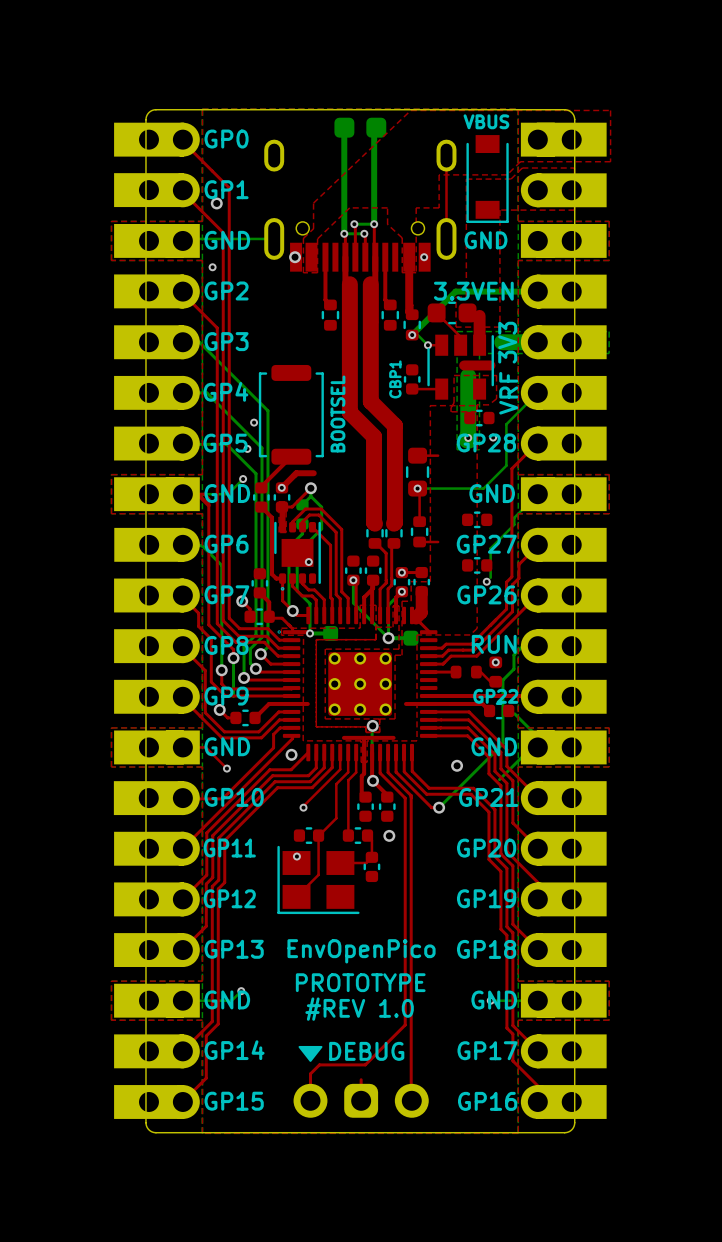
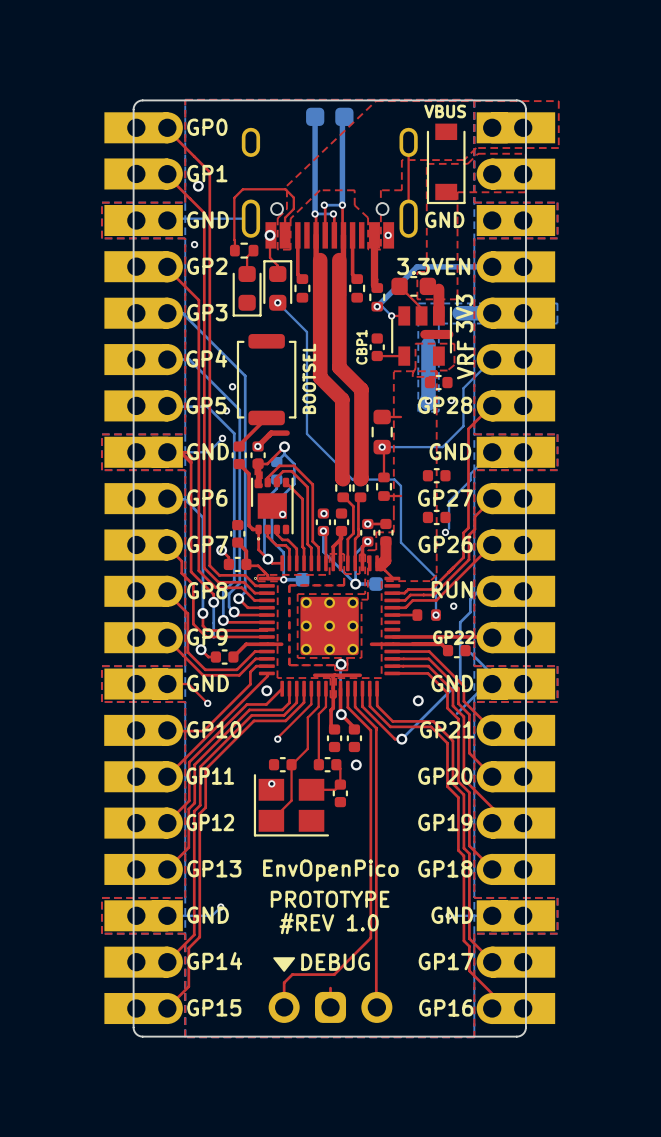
top track: none -> (270, 235) (270, 257) (277, 265) (277, 274)
top track: none -> (285, 235) (285, 217) (293, 209) (293, 197) (285, 189) (242, 189) (234, 197) (234, 250)
part: none -> (244, 250)
top track: none -> (253, 250) (247, 257) (247, 274)
part: none -> (277, 285)
part: none -> (247, 291)
bottom track: none -> (277, 302) (306, 332) (306, 433) (352, 479) (394, 479) (400, 485) (400, 542) (435, 577) (435, 615)
via: none -> (277, 302)
via: none -> (323, 513)
via: none -> (435, 615)
top track: (480, 672) (490, 681) (495, 681) -> none
part: (495, 672) -> none

